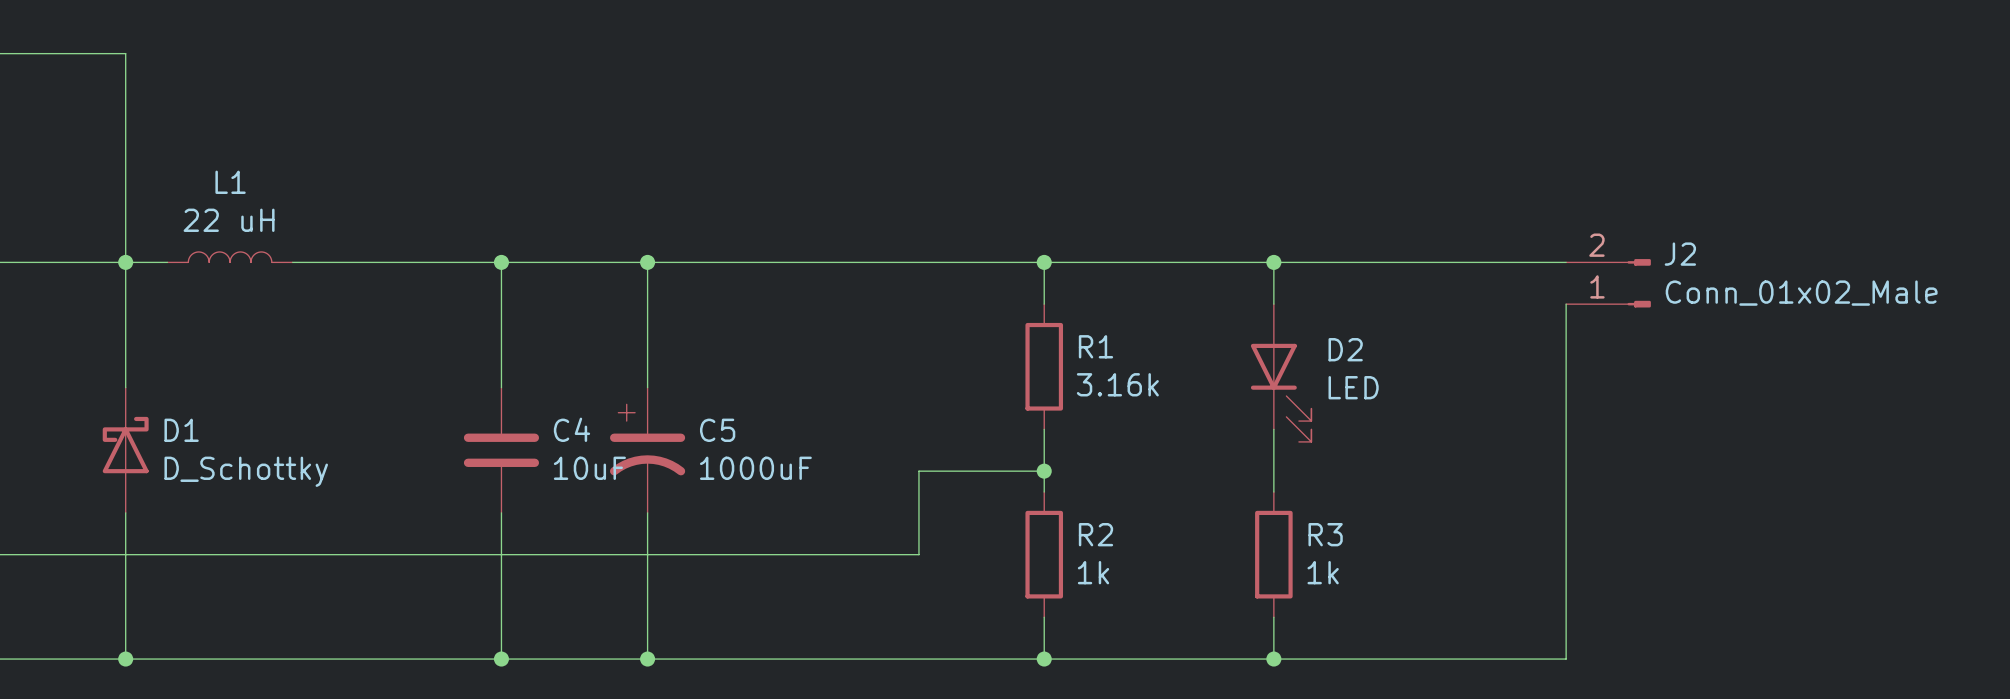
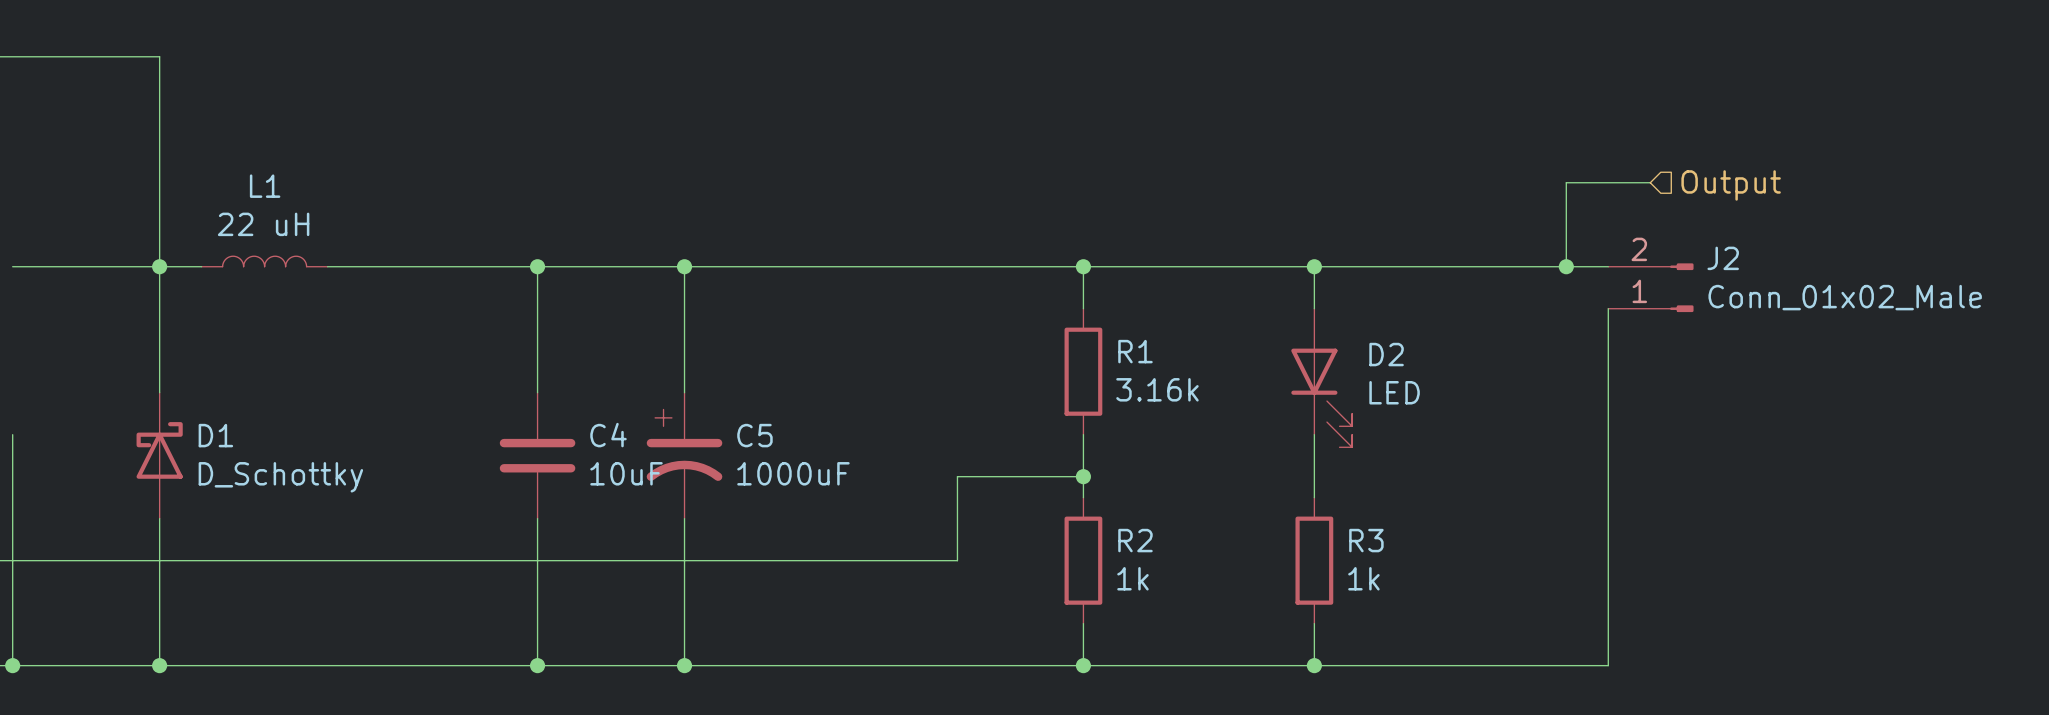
wire: none -> (1650, 182) (1566, 182) (1566, 266)
hierarchical label: none -> Output (1731, 185)
junction: none -> (1566, 266)

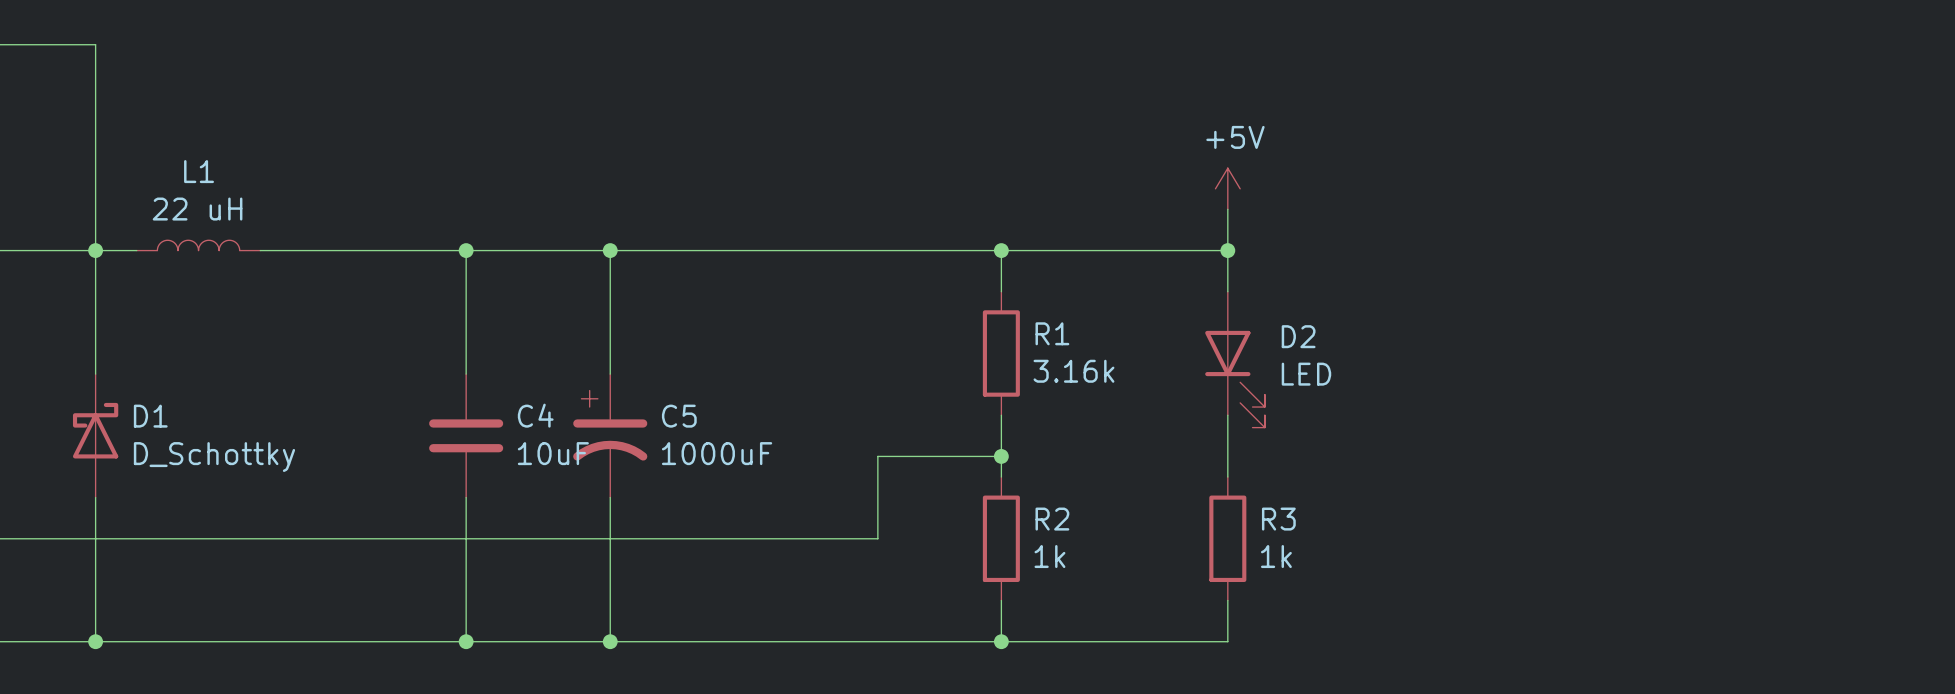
wire: (1650, 182) (1566, 182) (1566, 266) -> none
hierarchical label: Output (1731, 185) -> none
power symbol: none -> +5V (1227, 188)
wire: (1314, 266) (1608, 266) -> (1227, 250) (1227, 209)
junction: (1566, 266) -> none
J2: Conn_01x02_Male (1650, 287) -> none
wire: (1608, 308) (1608, 665) (1314, 665) -> none
junction: (1314, 665) -> none

